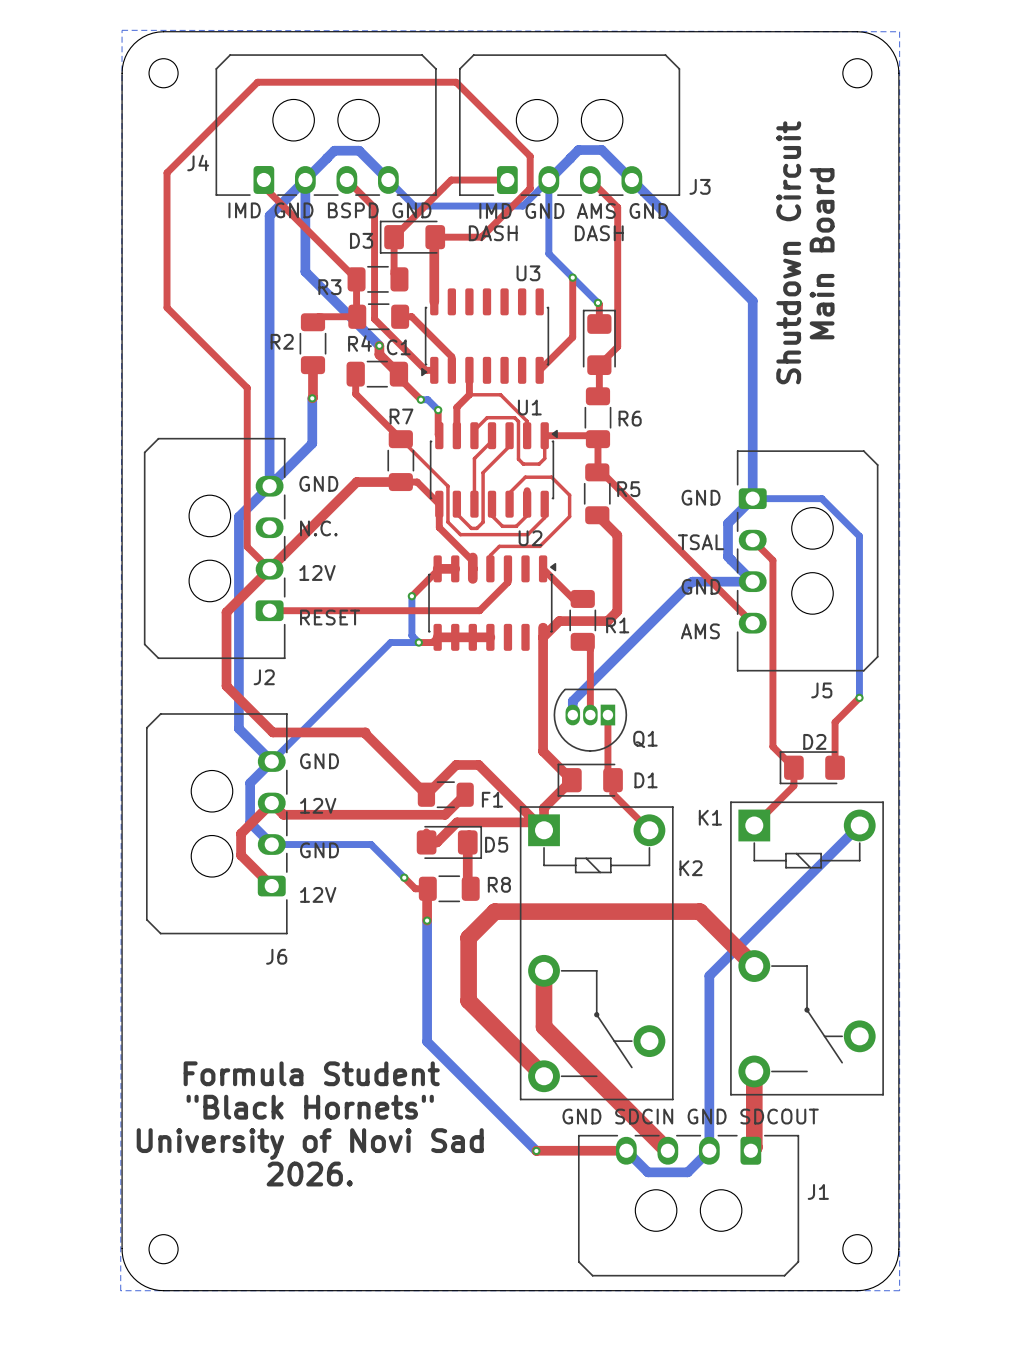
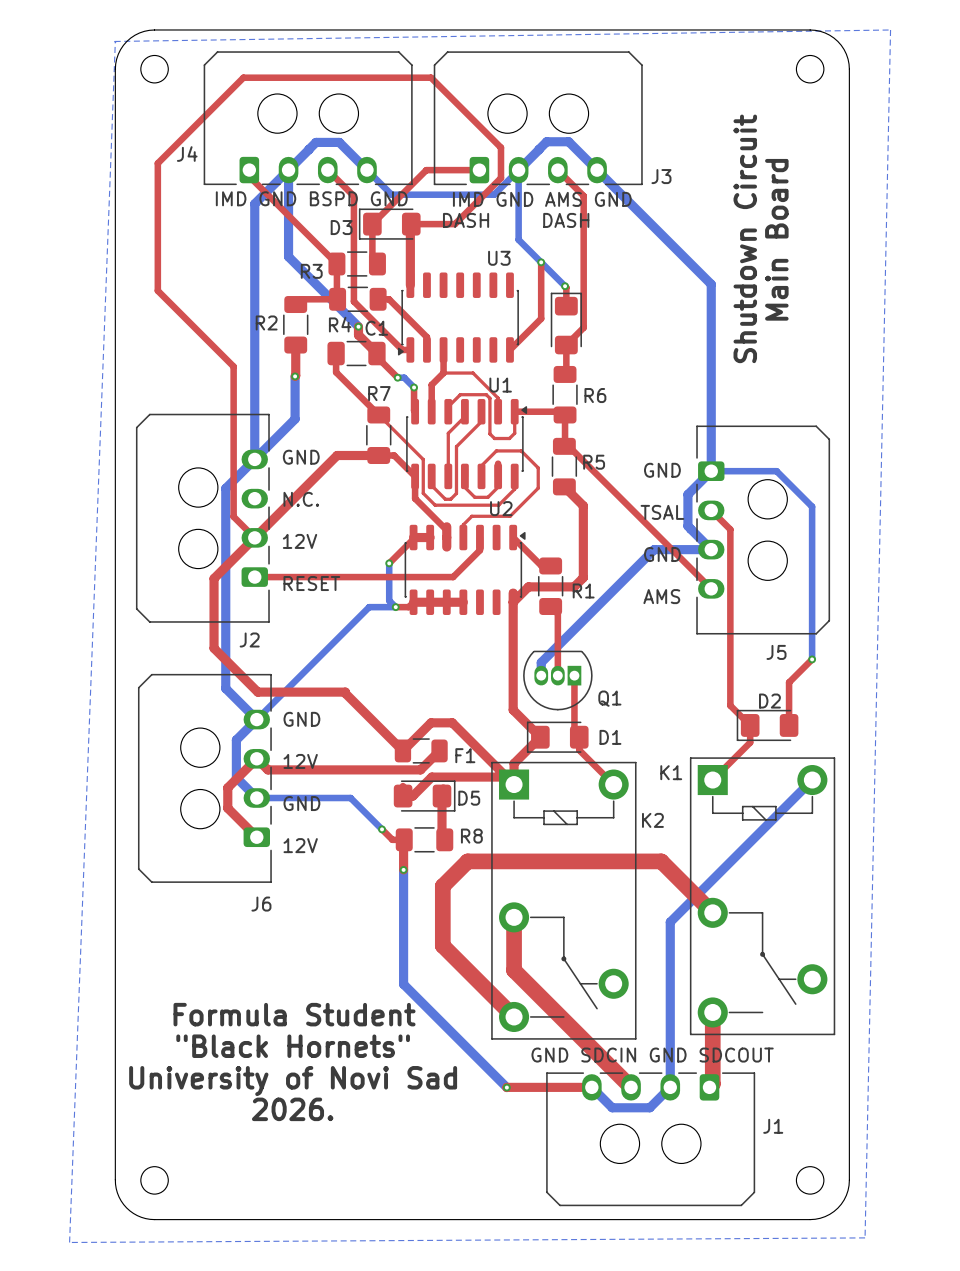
bottom zone outline: (122, 30) (899, 31) (899, 1290) (120, 1290) (122, 30) -> (890, 29) (114, 41) (69, 1242) (865, 1237) (890, 29)

